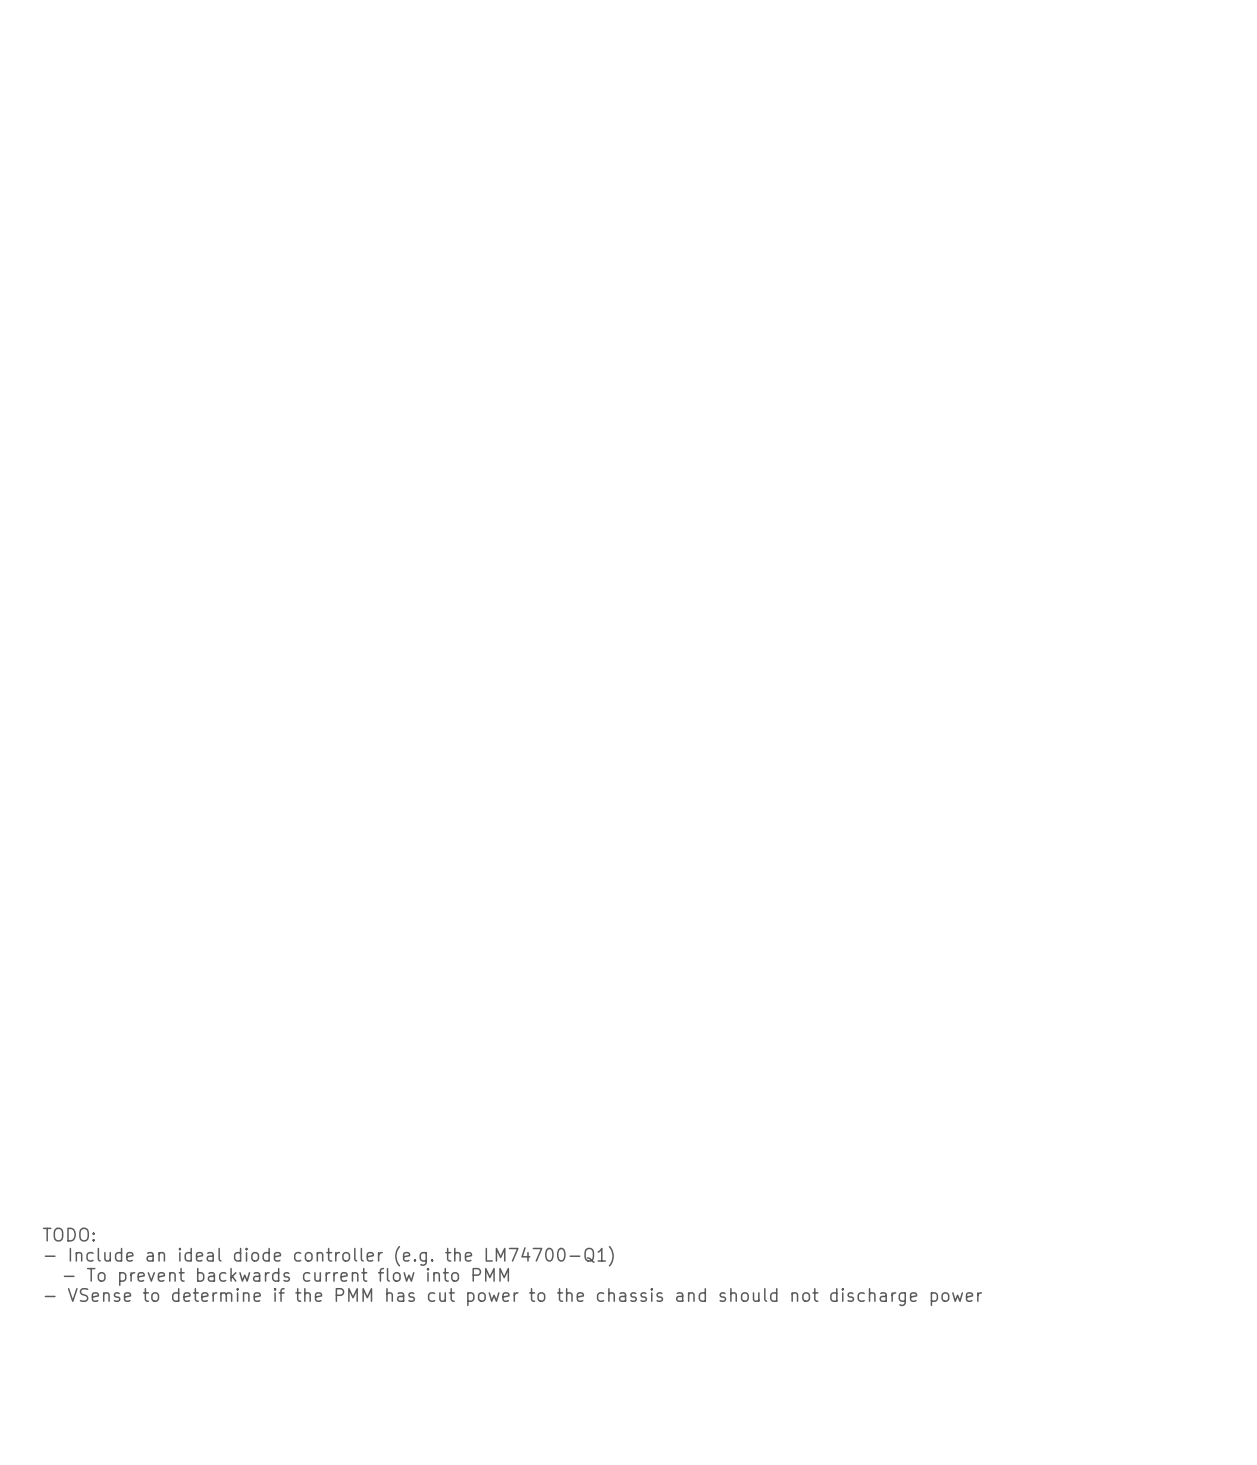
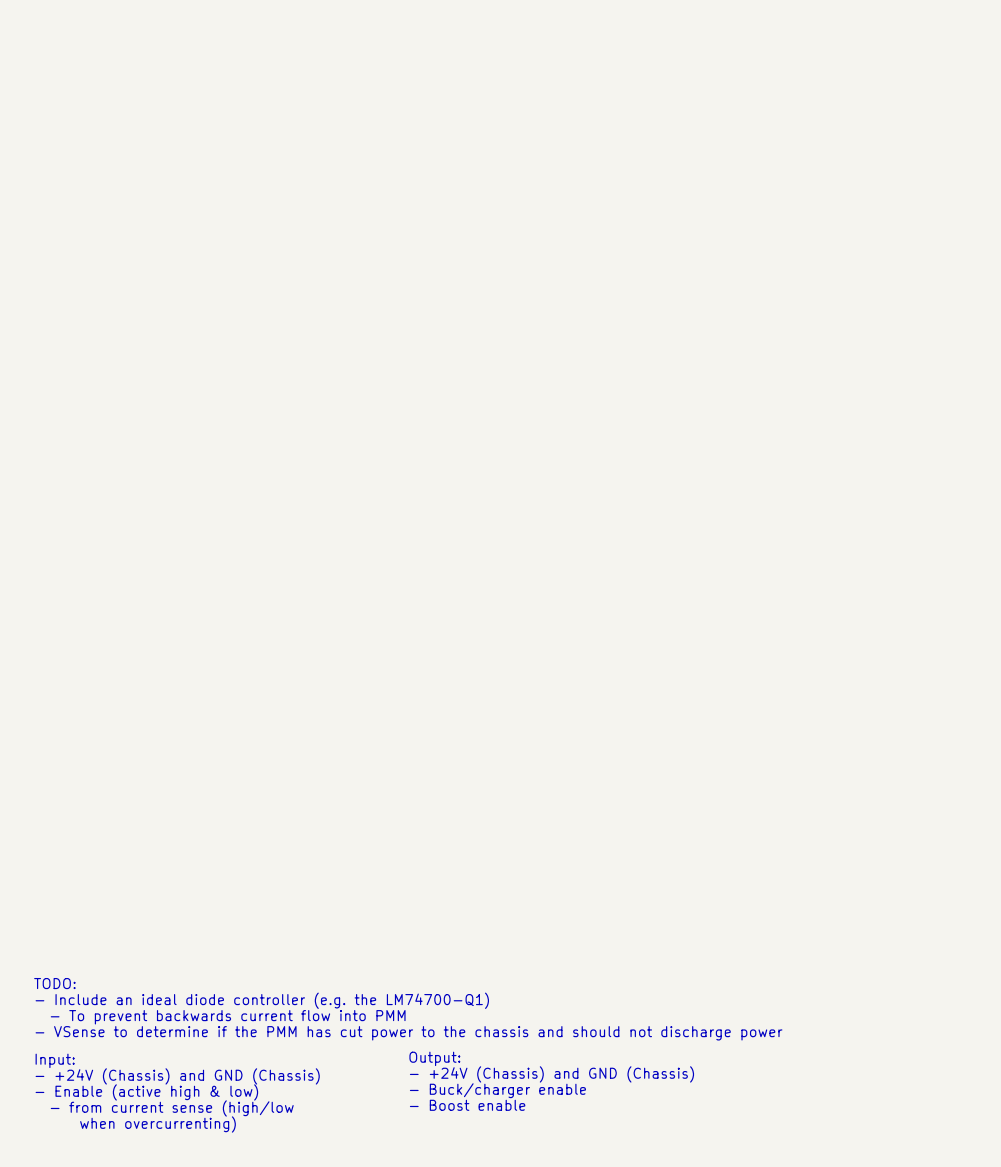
text: none -> Output: (434, 1058)
text: none -> Input: (55, 1060)
text: none -> - +24V (Chassis) and GND (Chassis) (551, 1074)
text: none -> - +24V (Chassis) and GND (Chassis) (177, 1076)
text: none -> - Buck/charger enable (497, 1090)
text: none -> - Enable (active high & low) (146, 1092)
text: none -> - Boost enable (467, 1105)
text: none -> - from current sense (high/low (172, 1108)
text: none -> when overcurrenting) (157, 1124)

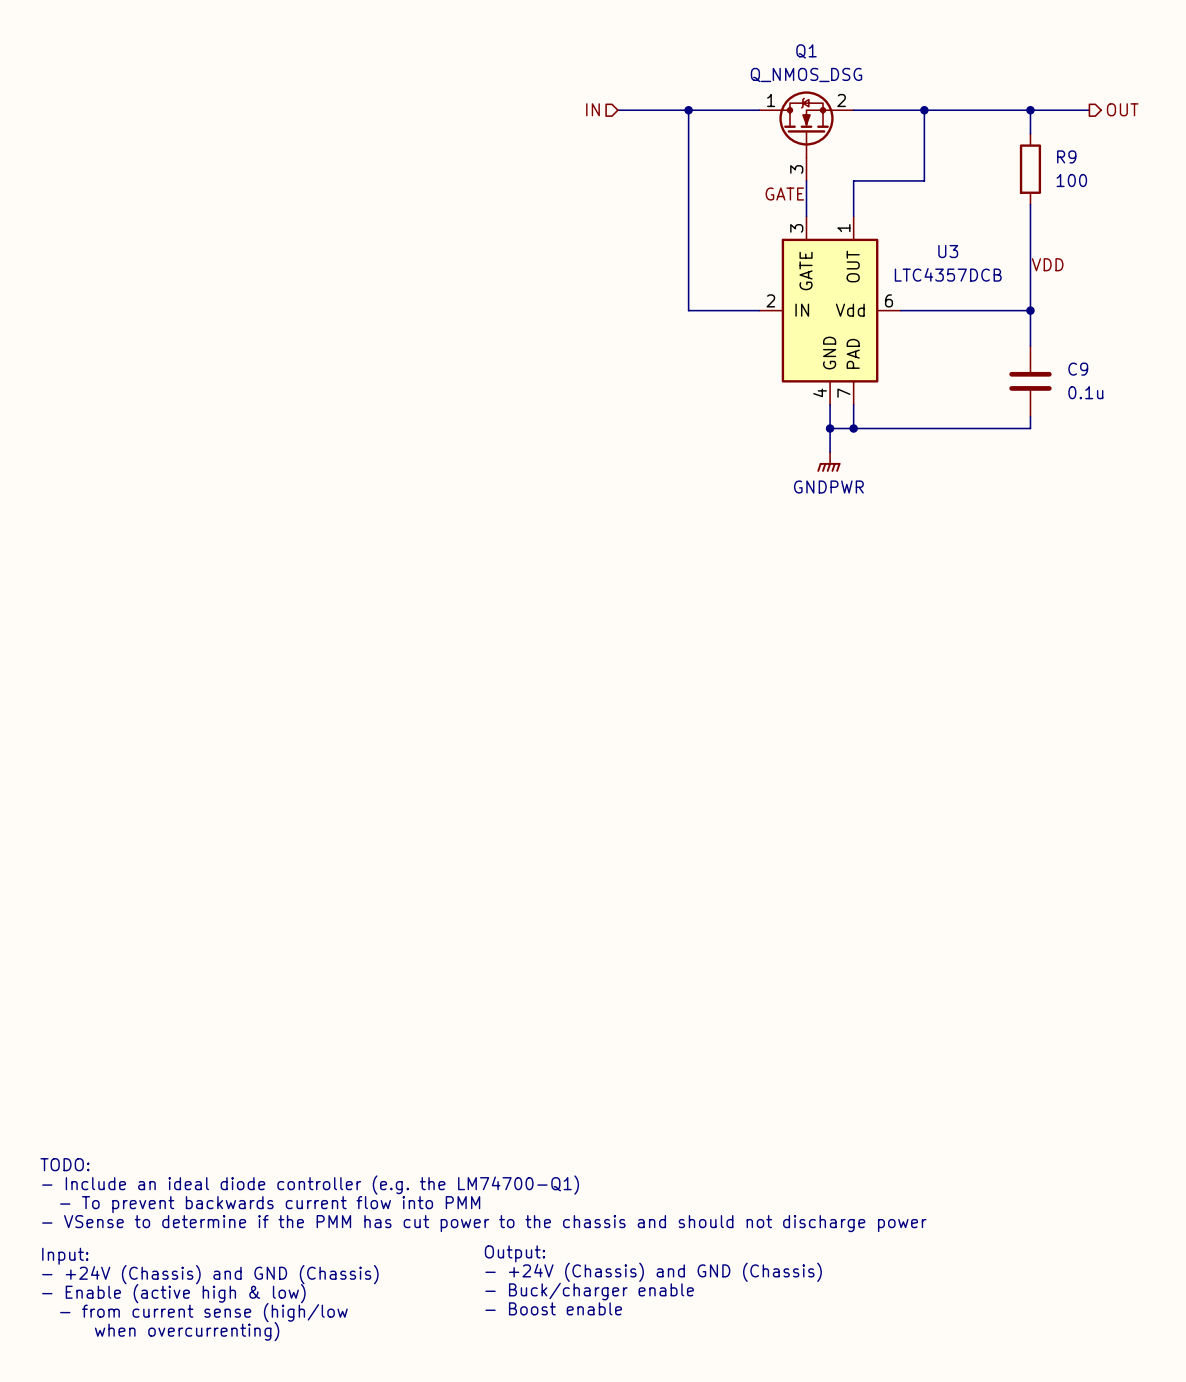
hierarchical label: none -> IN (593, 109)
hierarchical label: none -> OUT (1122, 109)
wire: none -> (617, 110) (759, 110)
wire: none -> (688, 110) (688, 310) (759, 310)
junction: none -> (688, 110)
wire: none -> (853, 110) (1089, 110)
wire: none -> (924, 110) (924, 180) (853, 180) (853, 216)
junction: none -> (924, 110)
wire: none -> (1030, 110) (1030, 133)
junction: none -> (1030, 110)
Q1: none -> Q_NMOS_DSG (806, 136)
R9: none -> 100 (1030, 169)
wire: none -> (806, 180) (806, 216)
label: none -> GATE (784, 194)
wire: none -> (1030, 204) (1030, 345)
label: none -> VDD (1047, 264)
U3: none -> LTC4357DCB (830, 310)
wire: none -> (900, 310) (1030, 310)
junction: none -> (1030, 310)
C9: none -> 0.1u (1030, 381)
wire: none -> (830, 404) (830, 452)
wire: none -> (853, 404) (853, 428)
wire: none -> (1030, 416) (1030, 428) (830, 428)
junction: none -> (830, 428)
junction: none -> (853, 428)
power symbol: none -> GNDPWR (828, 461)

